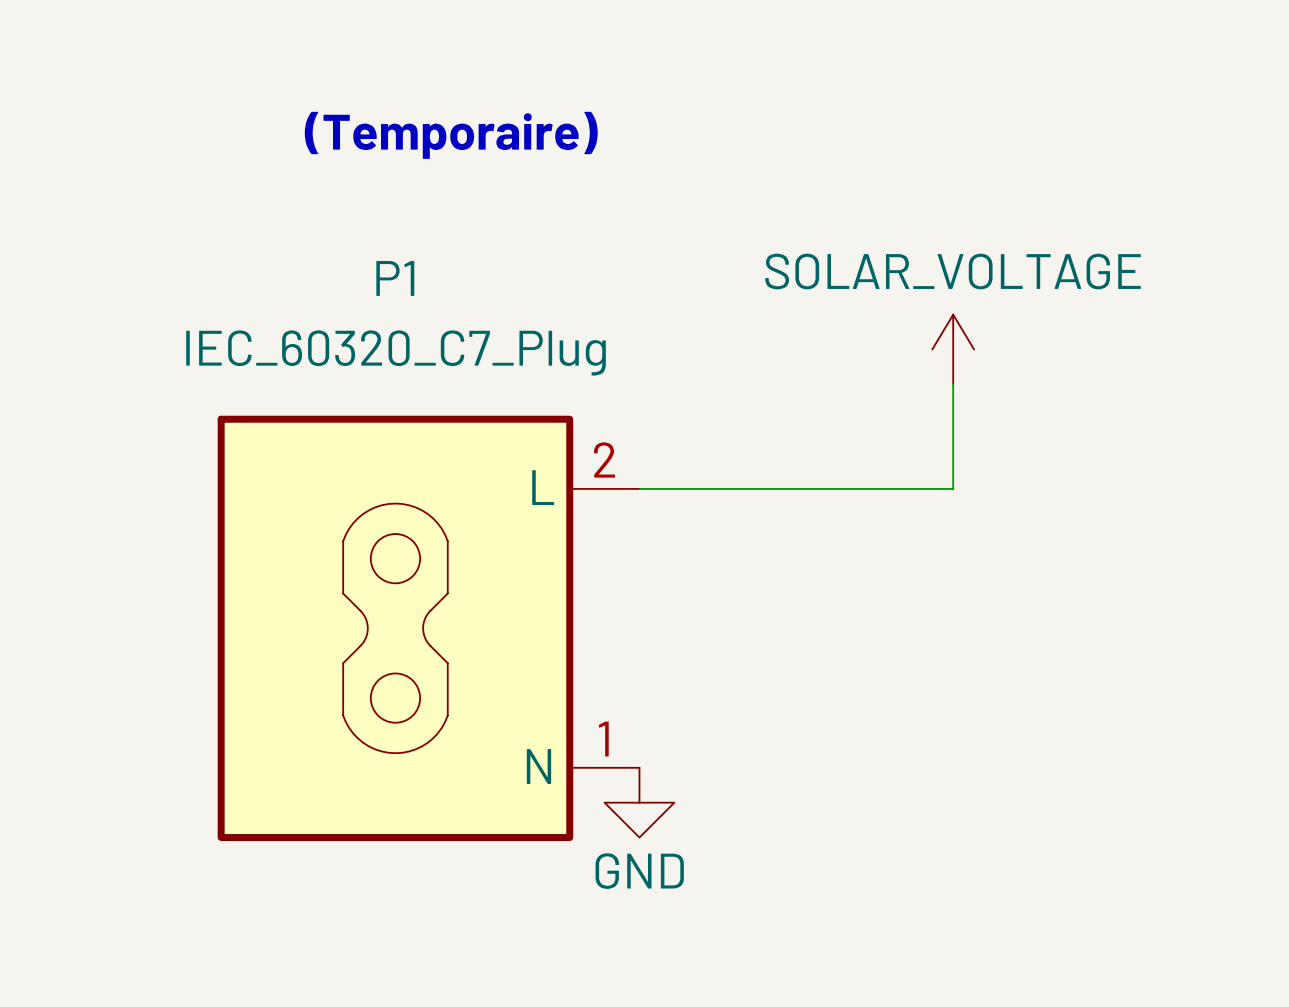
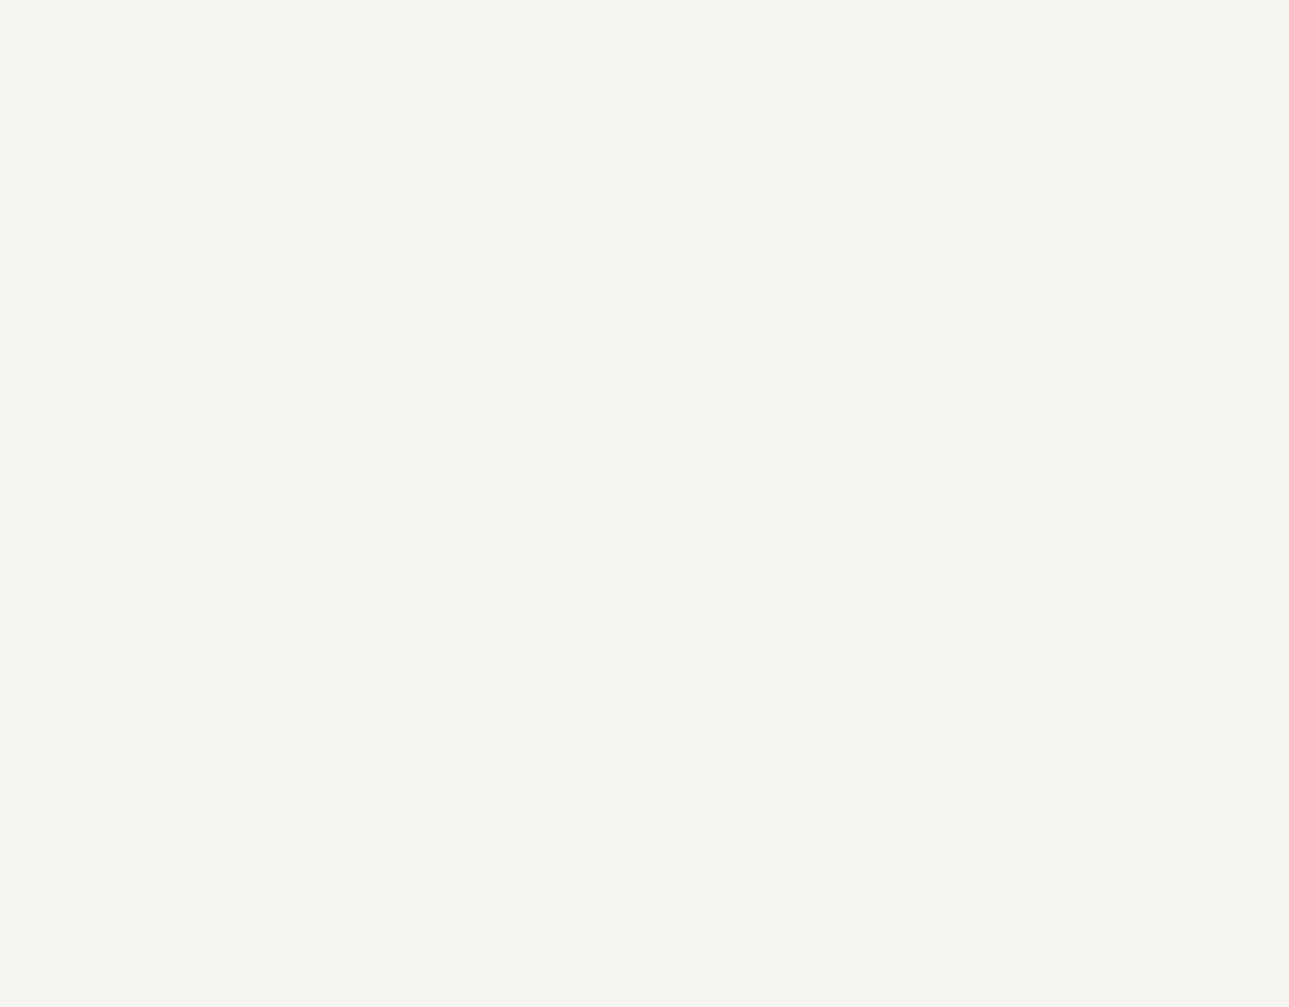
text: (Temporaire) (451, 135) -> none
power symbol: SOLAR_VOLTAGE (953, 349) -> none
wire: (953, 384) (953, 488) (639, 488) -> none
P1: IEC_60320_C7_Plug (428, 628) -> none
power symbol: GND (639, 802) -> none

